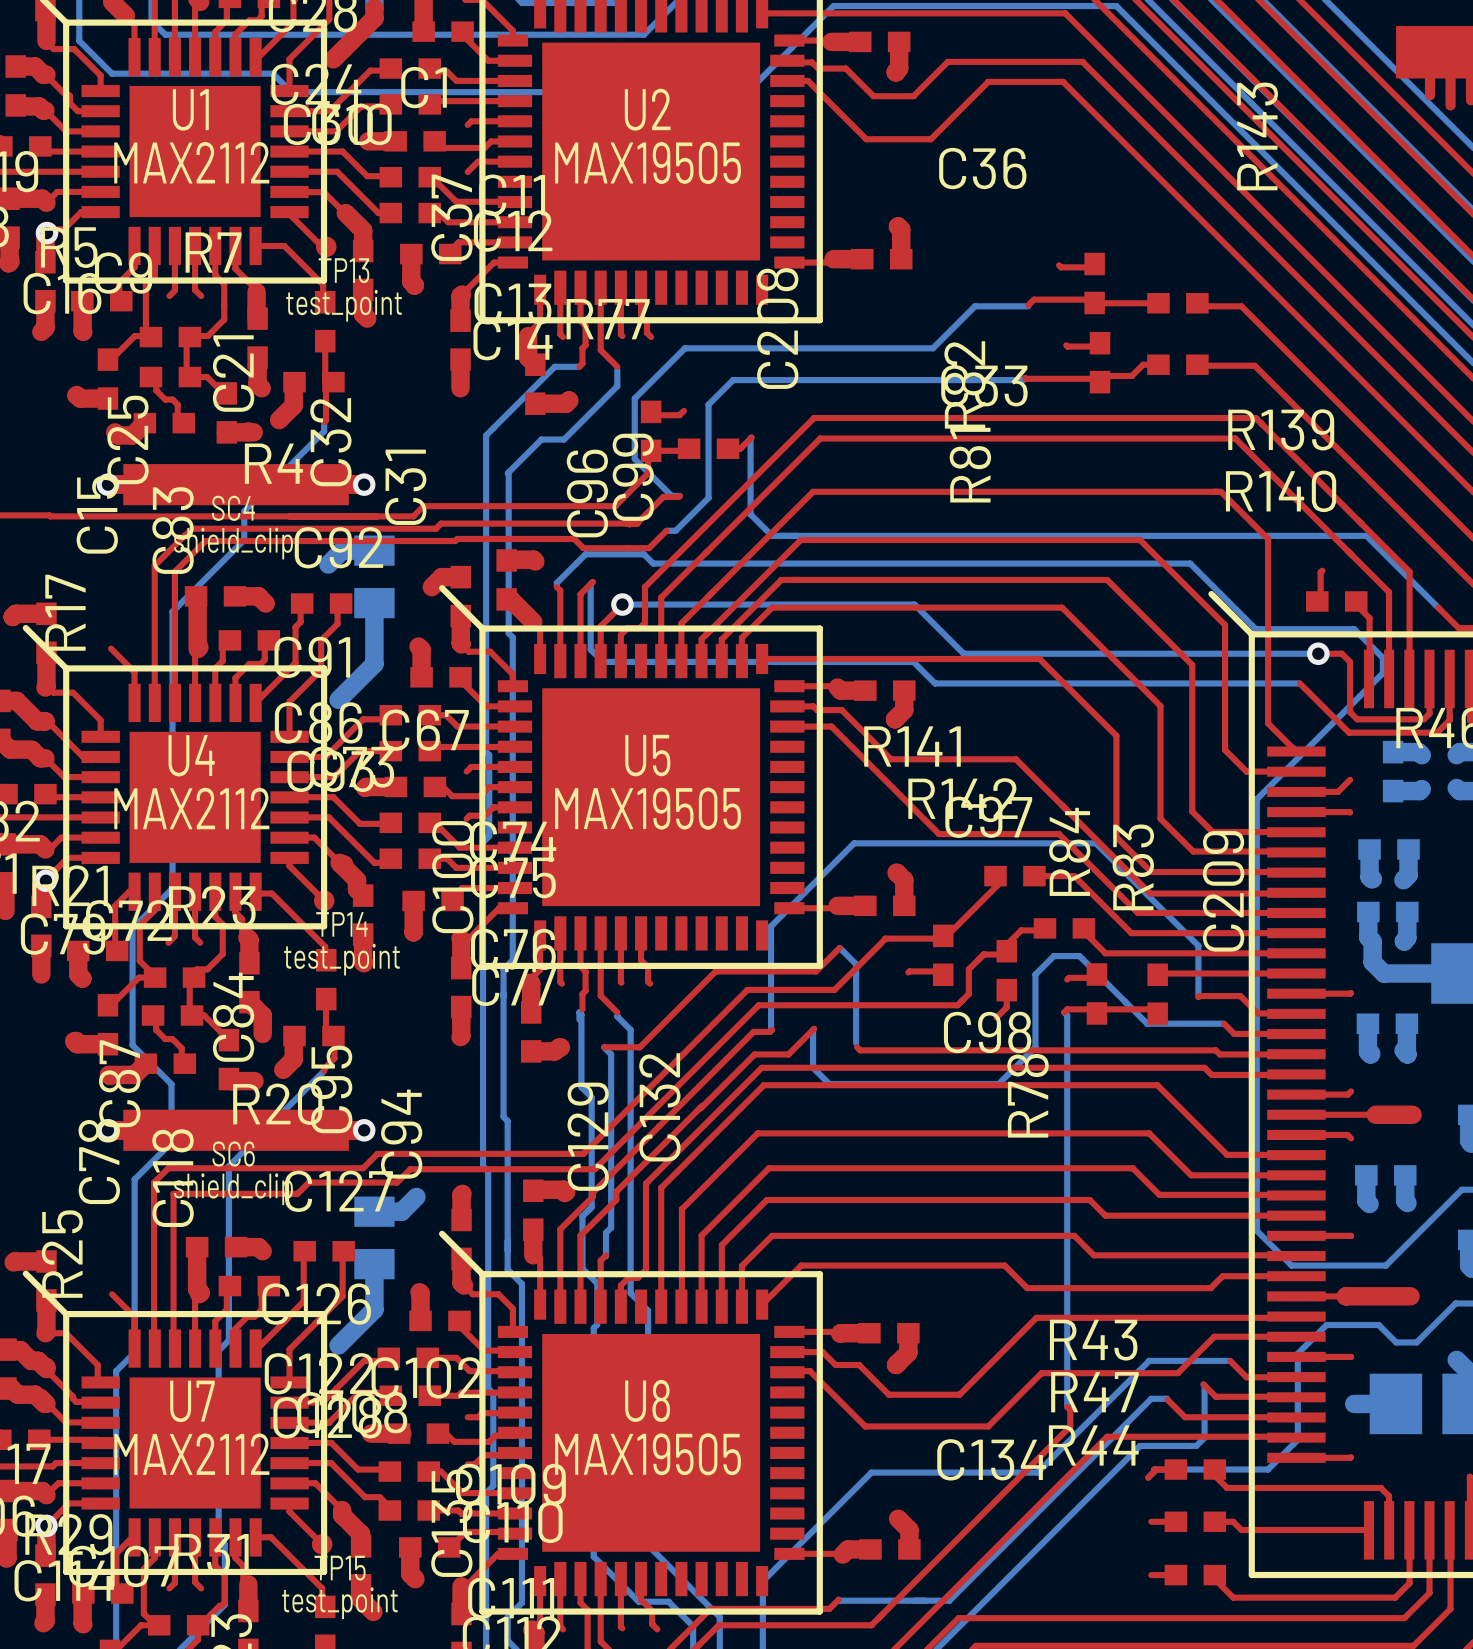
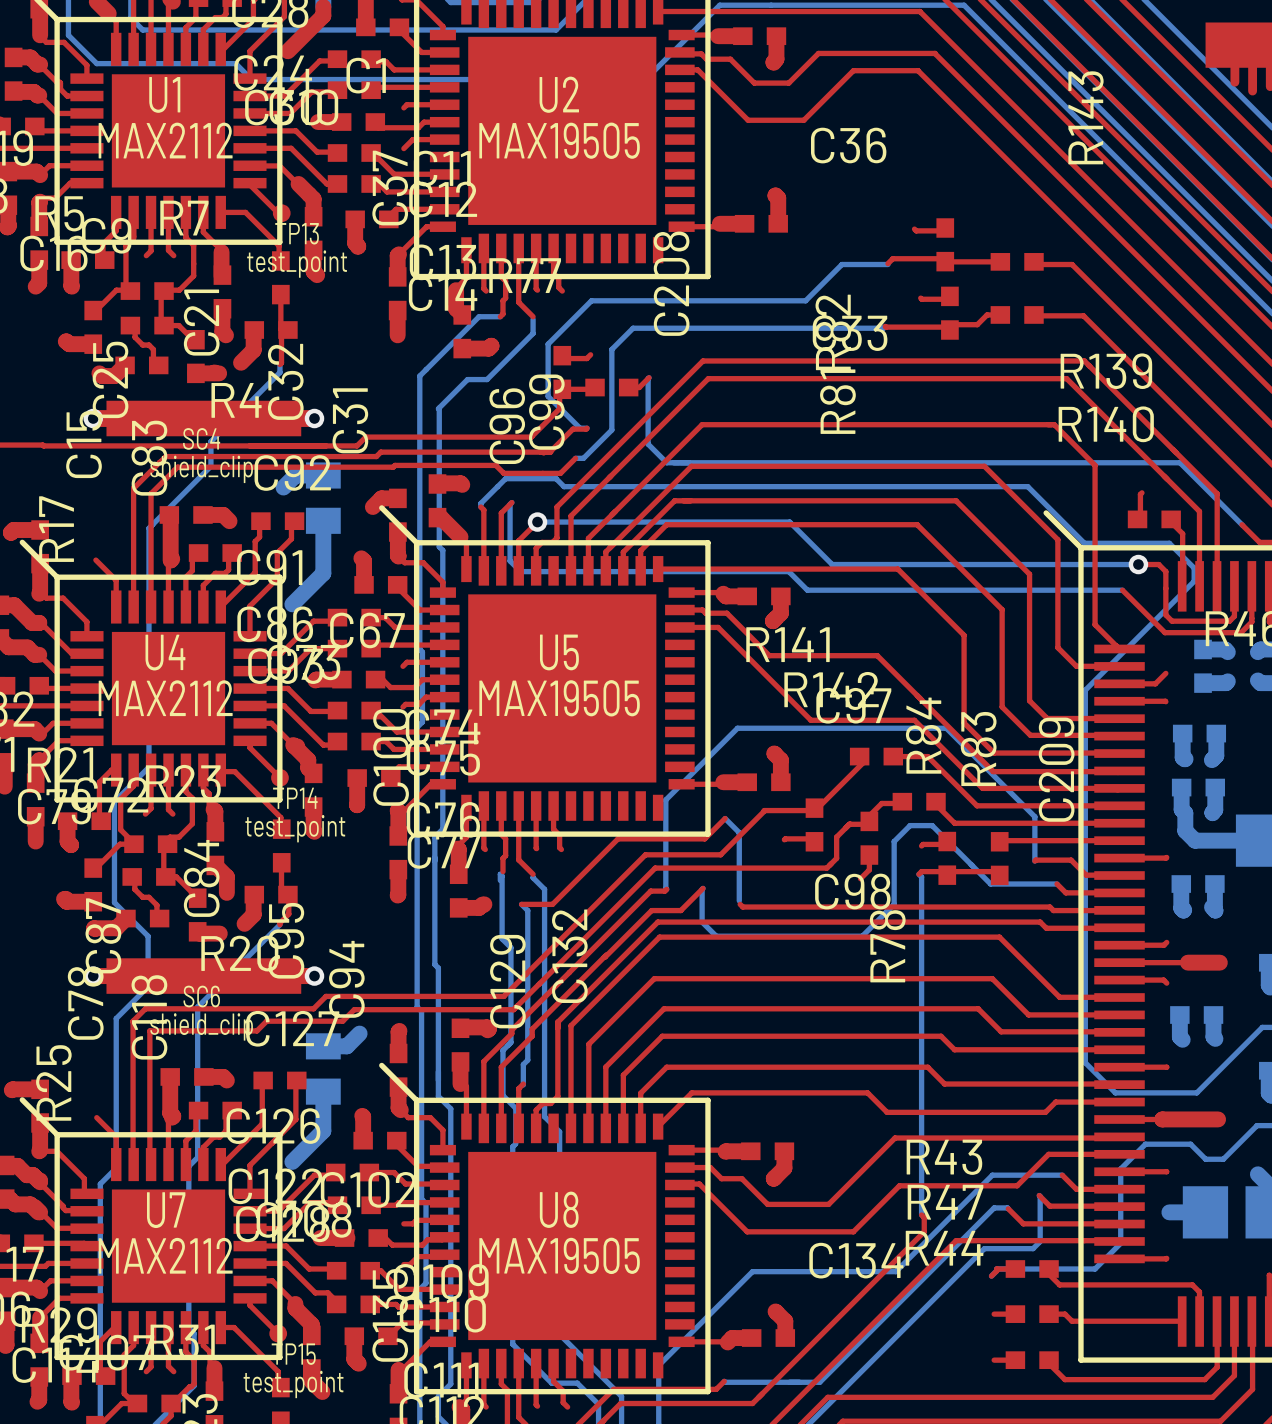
via: (46, 233) -> none
via: (45, 880) -> none
via: (46, 1525) -> none

